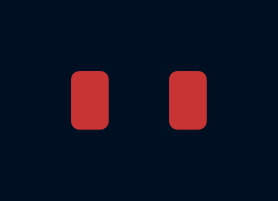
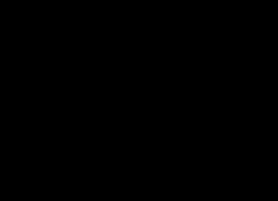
part: (138, 100) -> none

